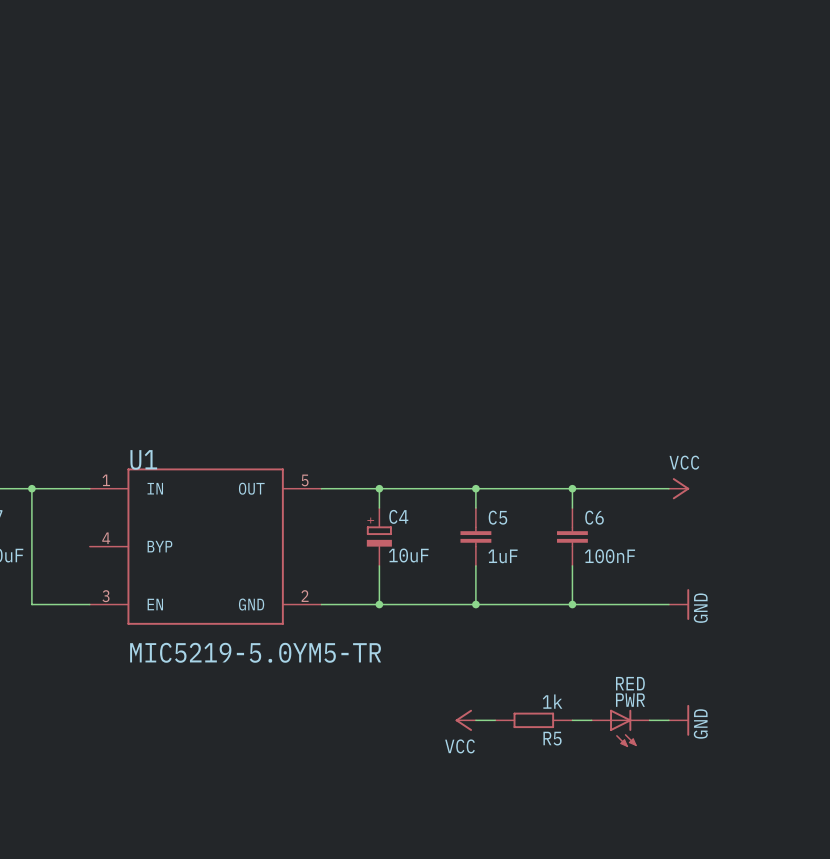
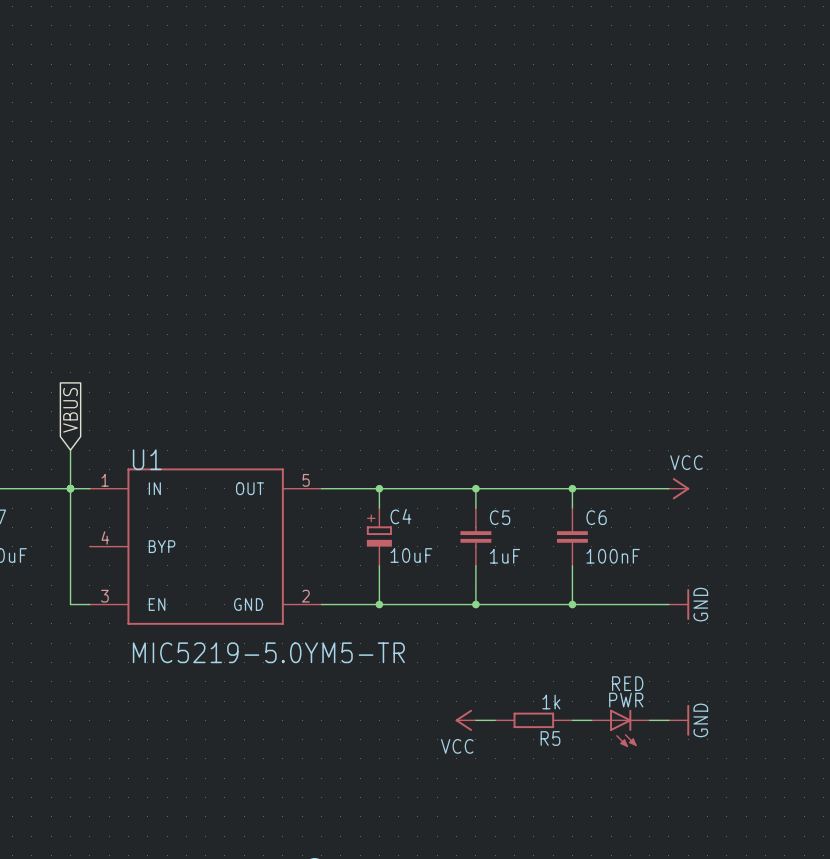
global label: none -> VBUS (70, 410)
wire: (31, 488) (31, 604) (70, 604) -> (70, 450) (70, 604)
junction position: (31, 488) -> (70, 488)

